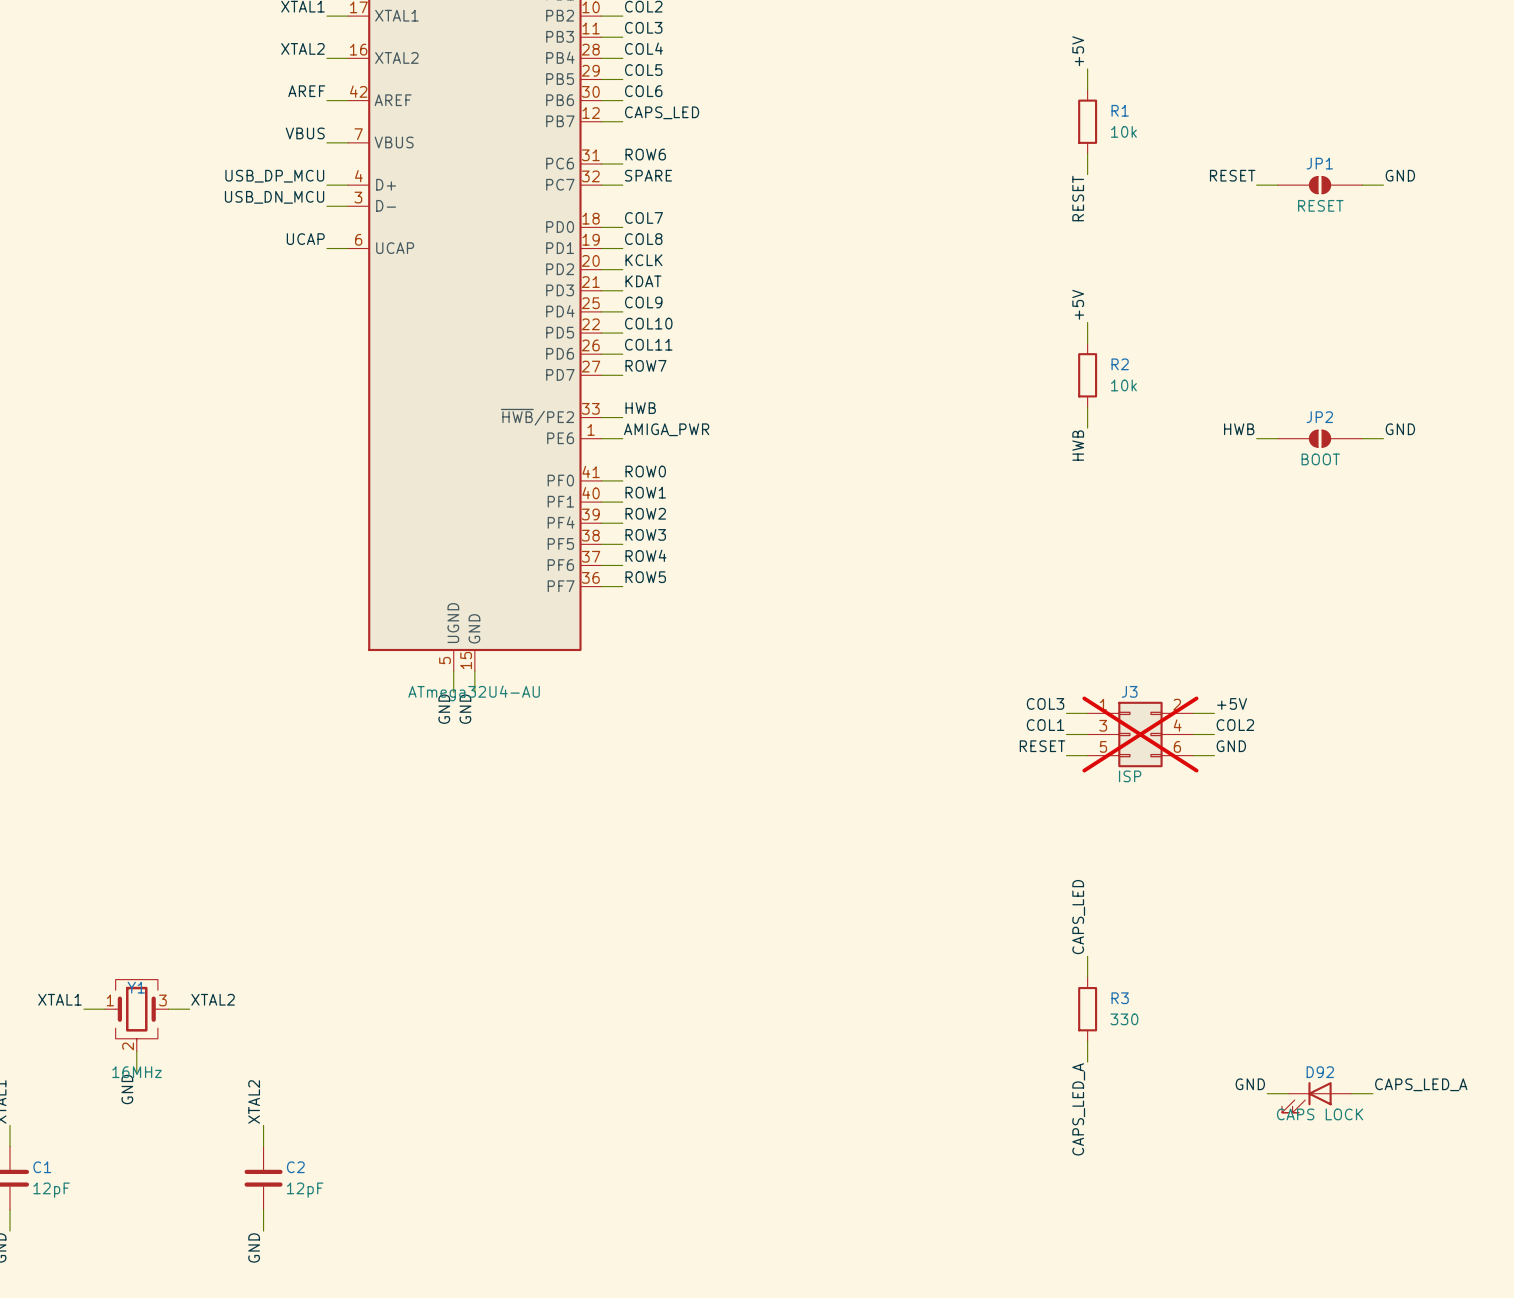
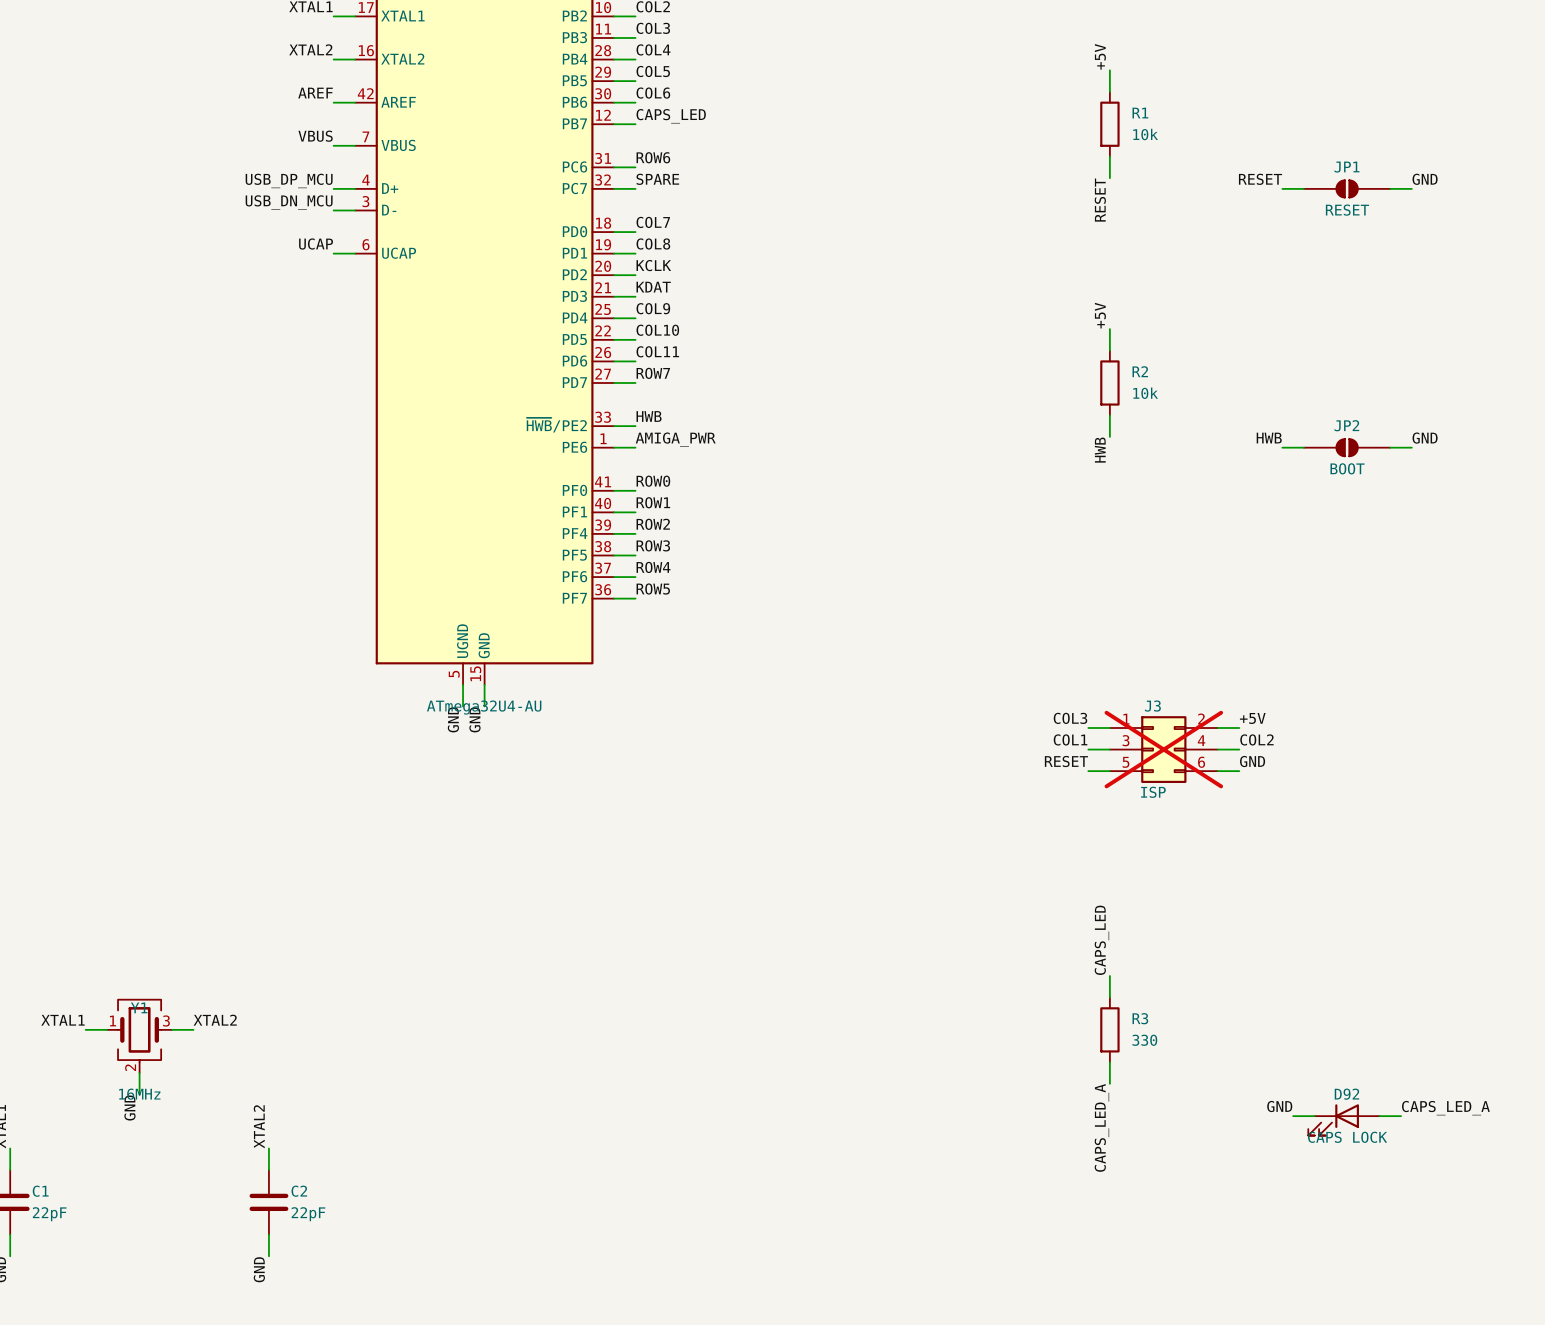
C1 value: 12pF (51, 1190) -> 22pF (49, 1214)
C2 value: 12pF (305, 1190) -> 22pF (308, 1214)

